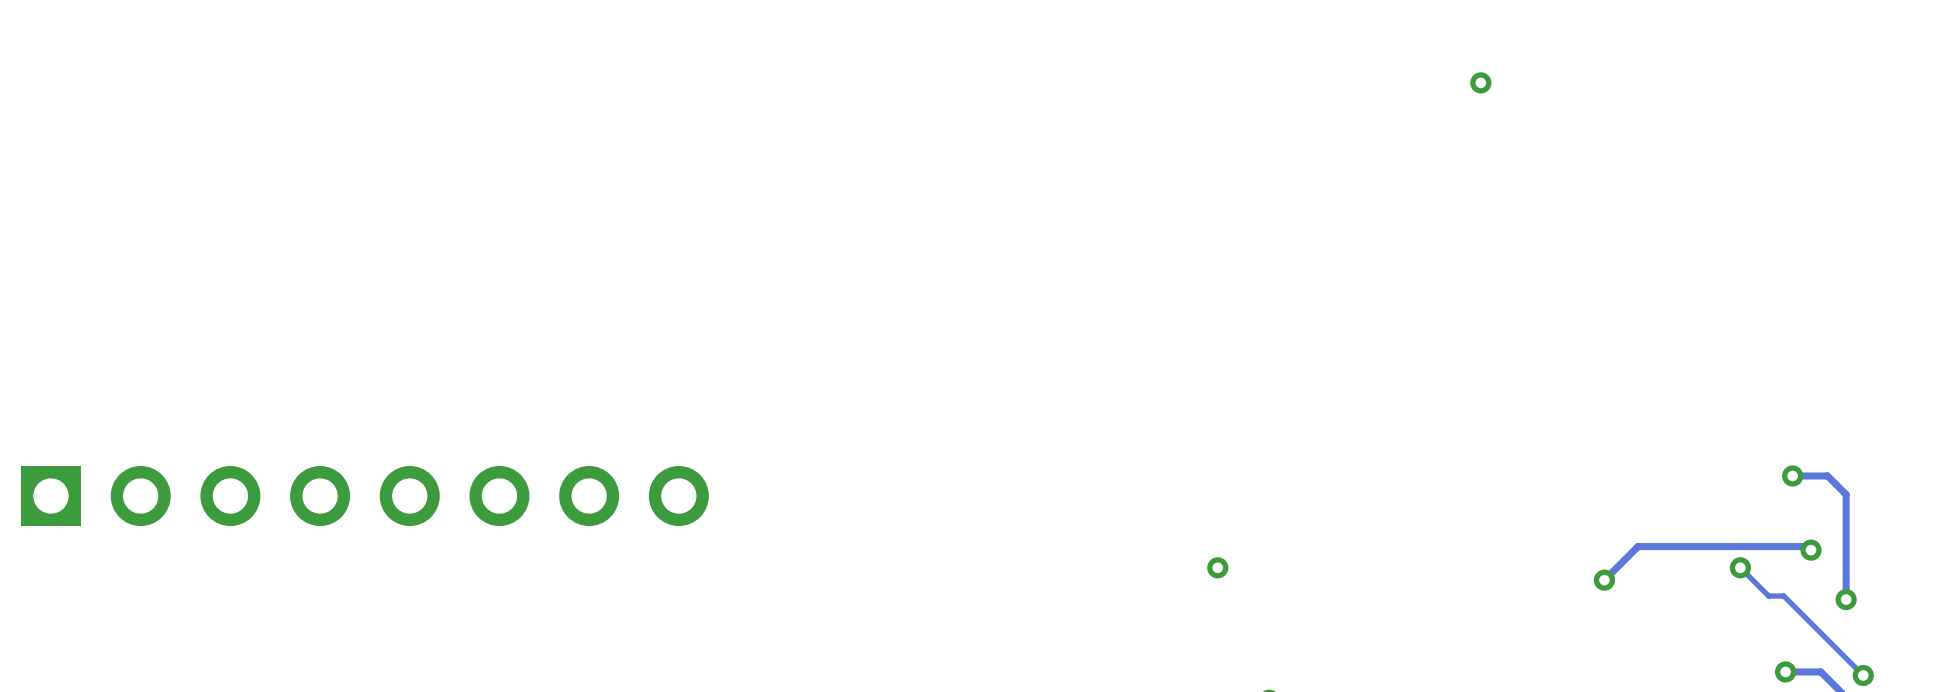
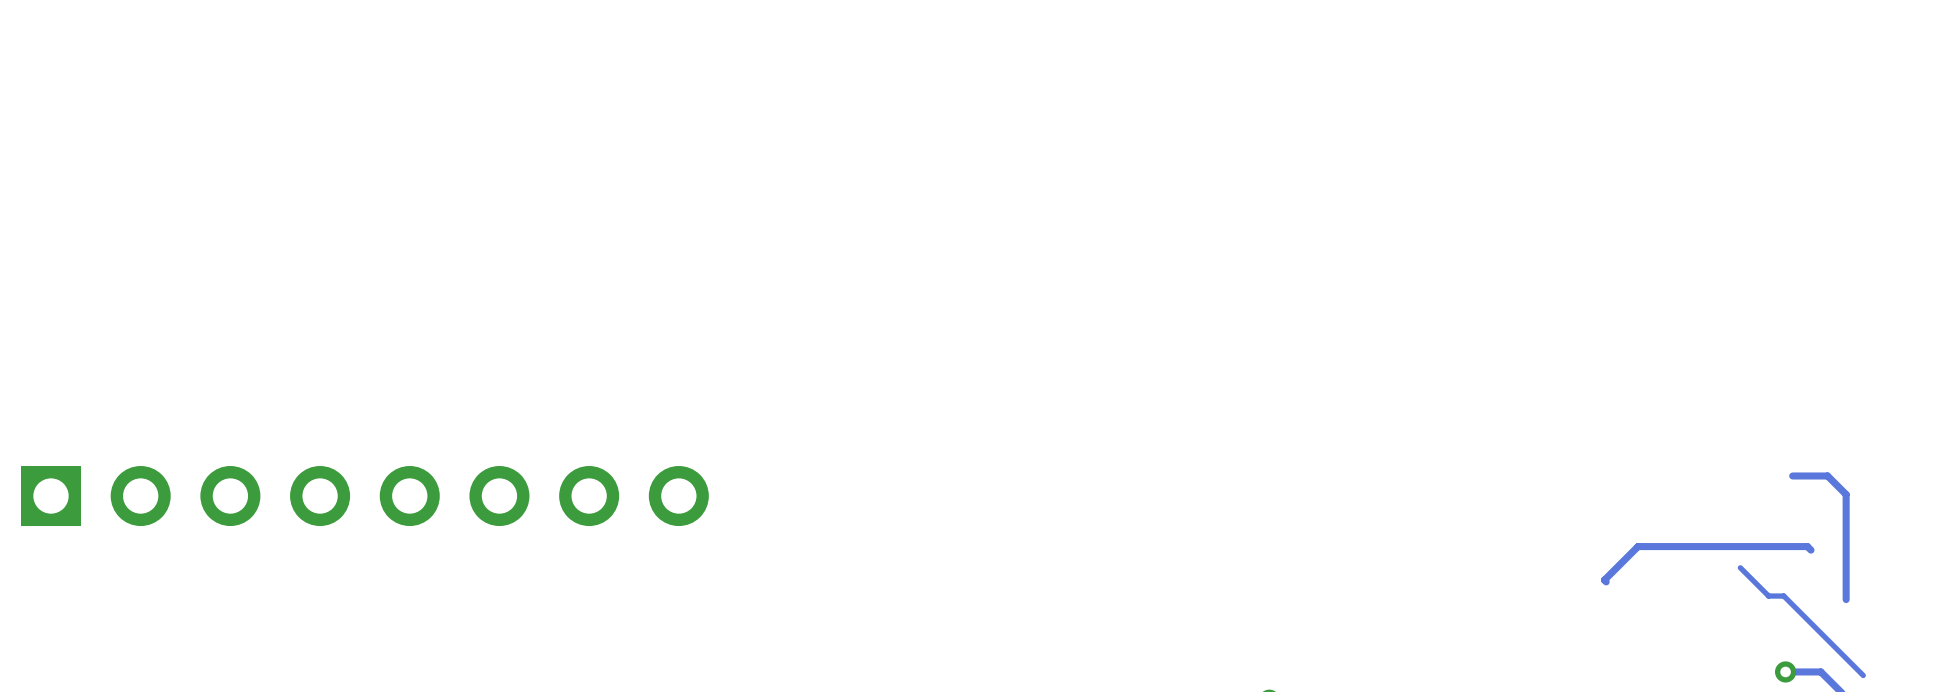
via: (1480, 82) -> none
via: (1792, 475) -> none
via: (1811, 550) -> none
via: (1217, 567) -> none
via: (1740, 567) -> none
via: (1604, 580) -> none
via: (1846, 599) -> none
via: (1863, 675) -> none

